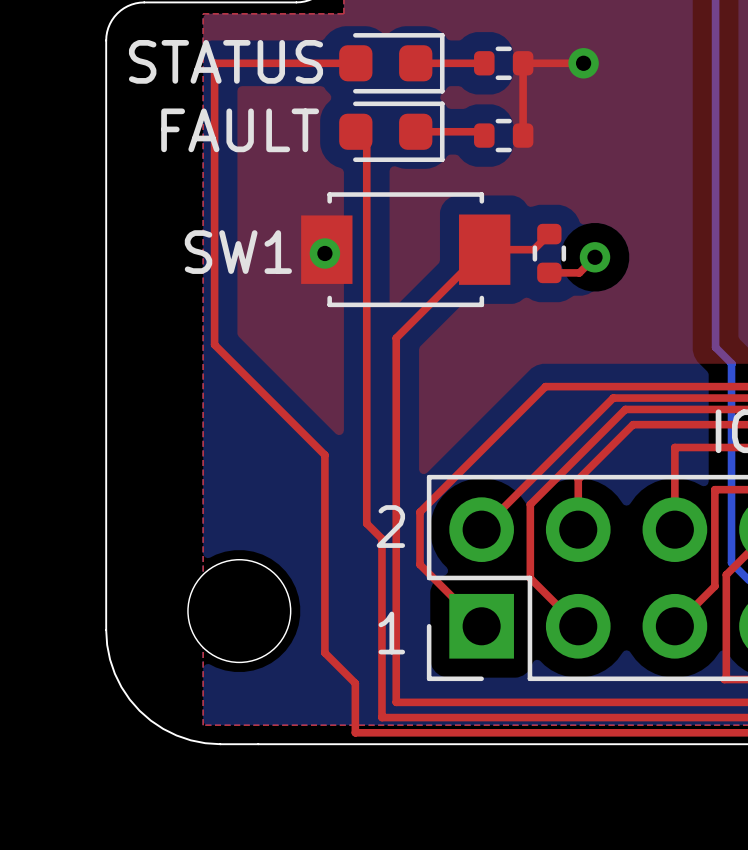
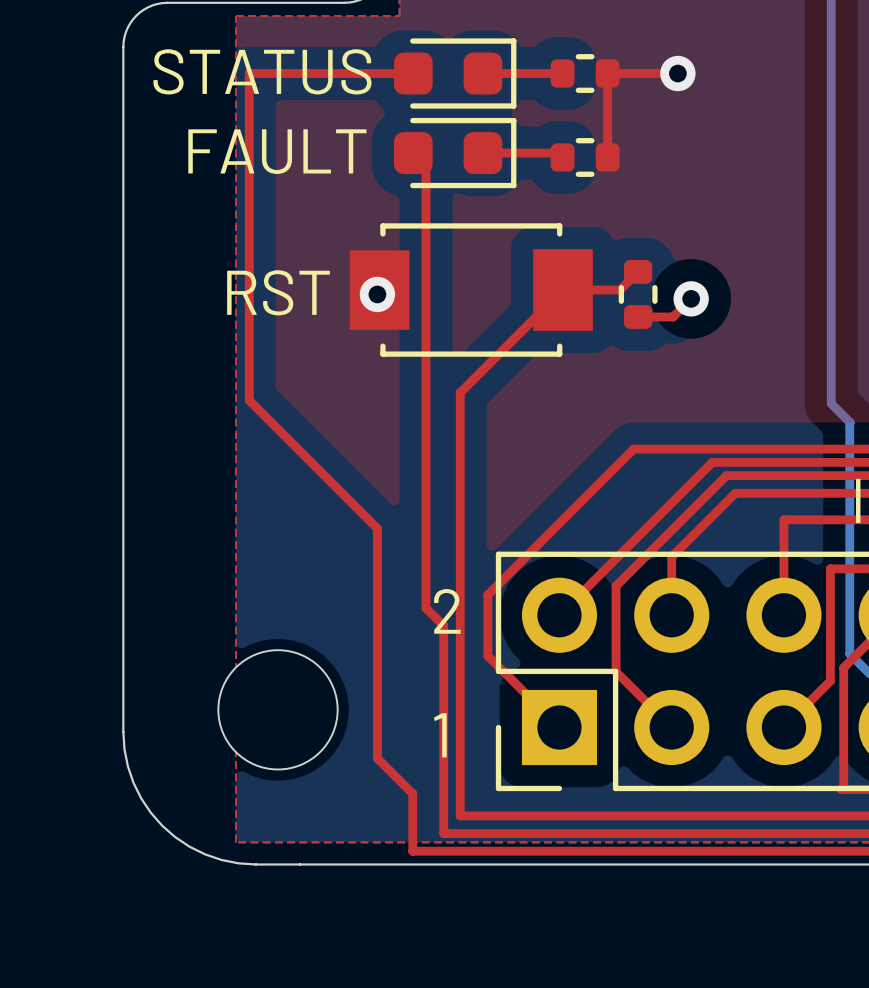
SW1 name: SW1 (238, 252) -> RST (278, 292)

